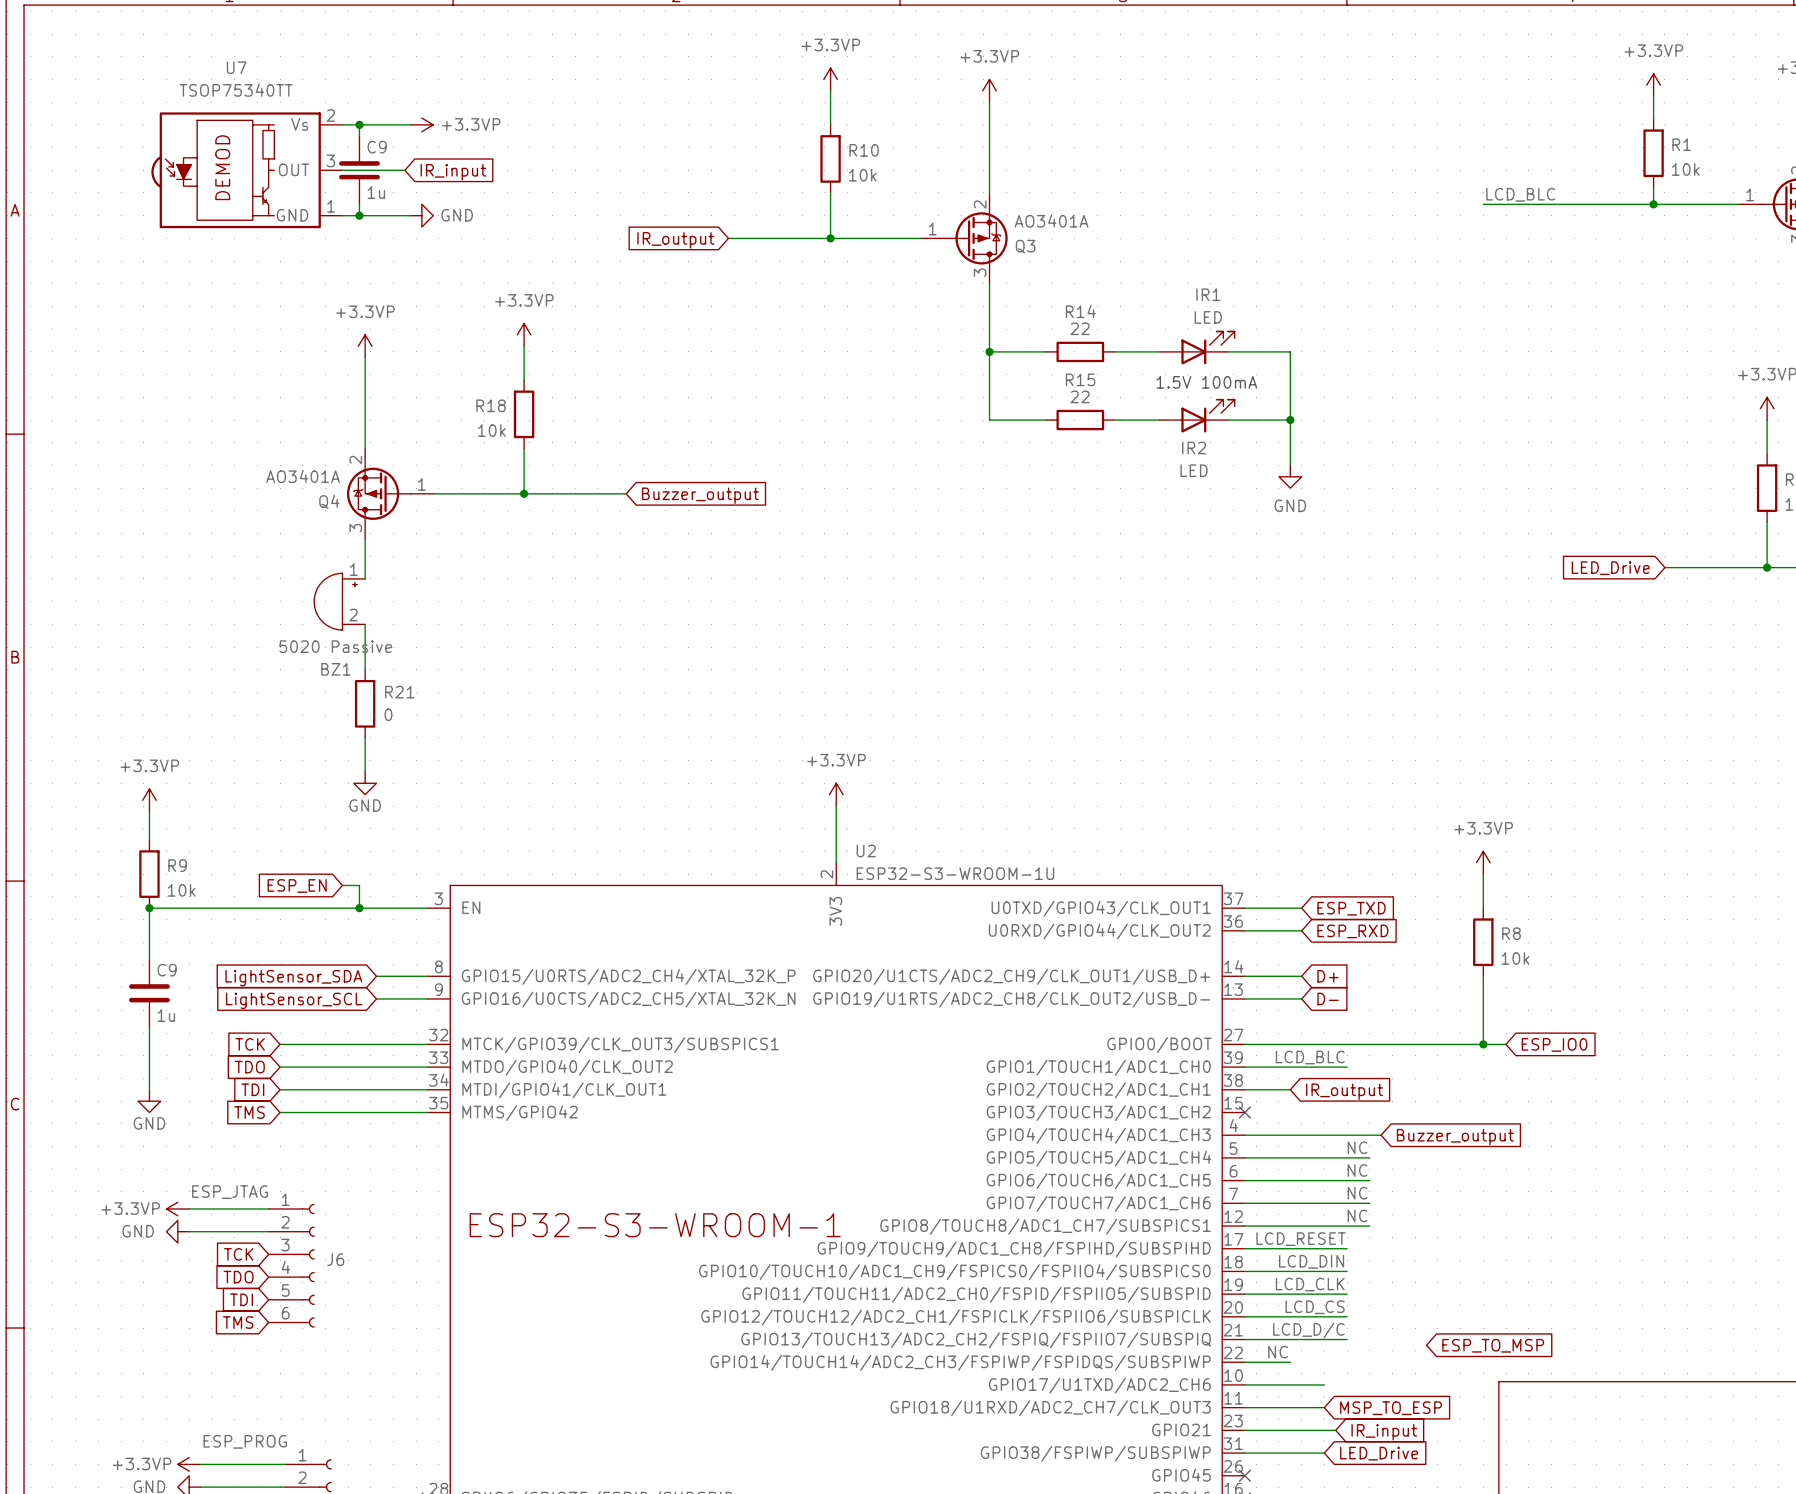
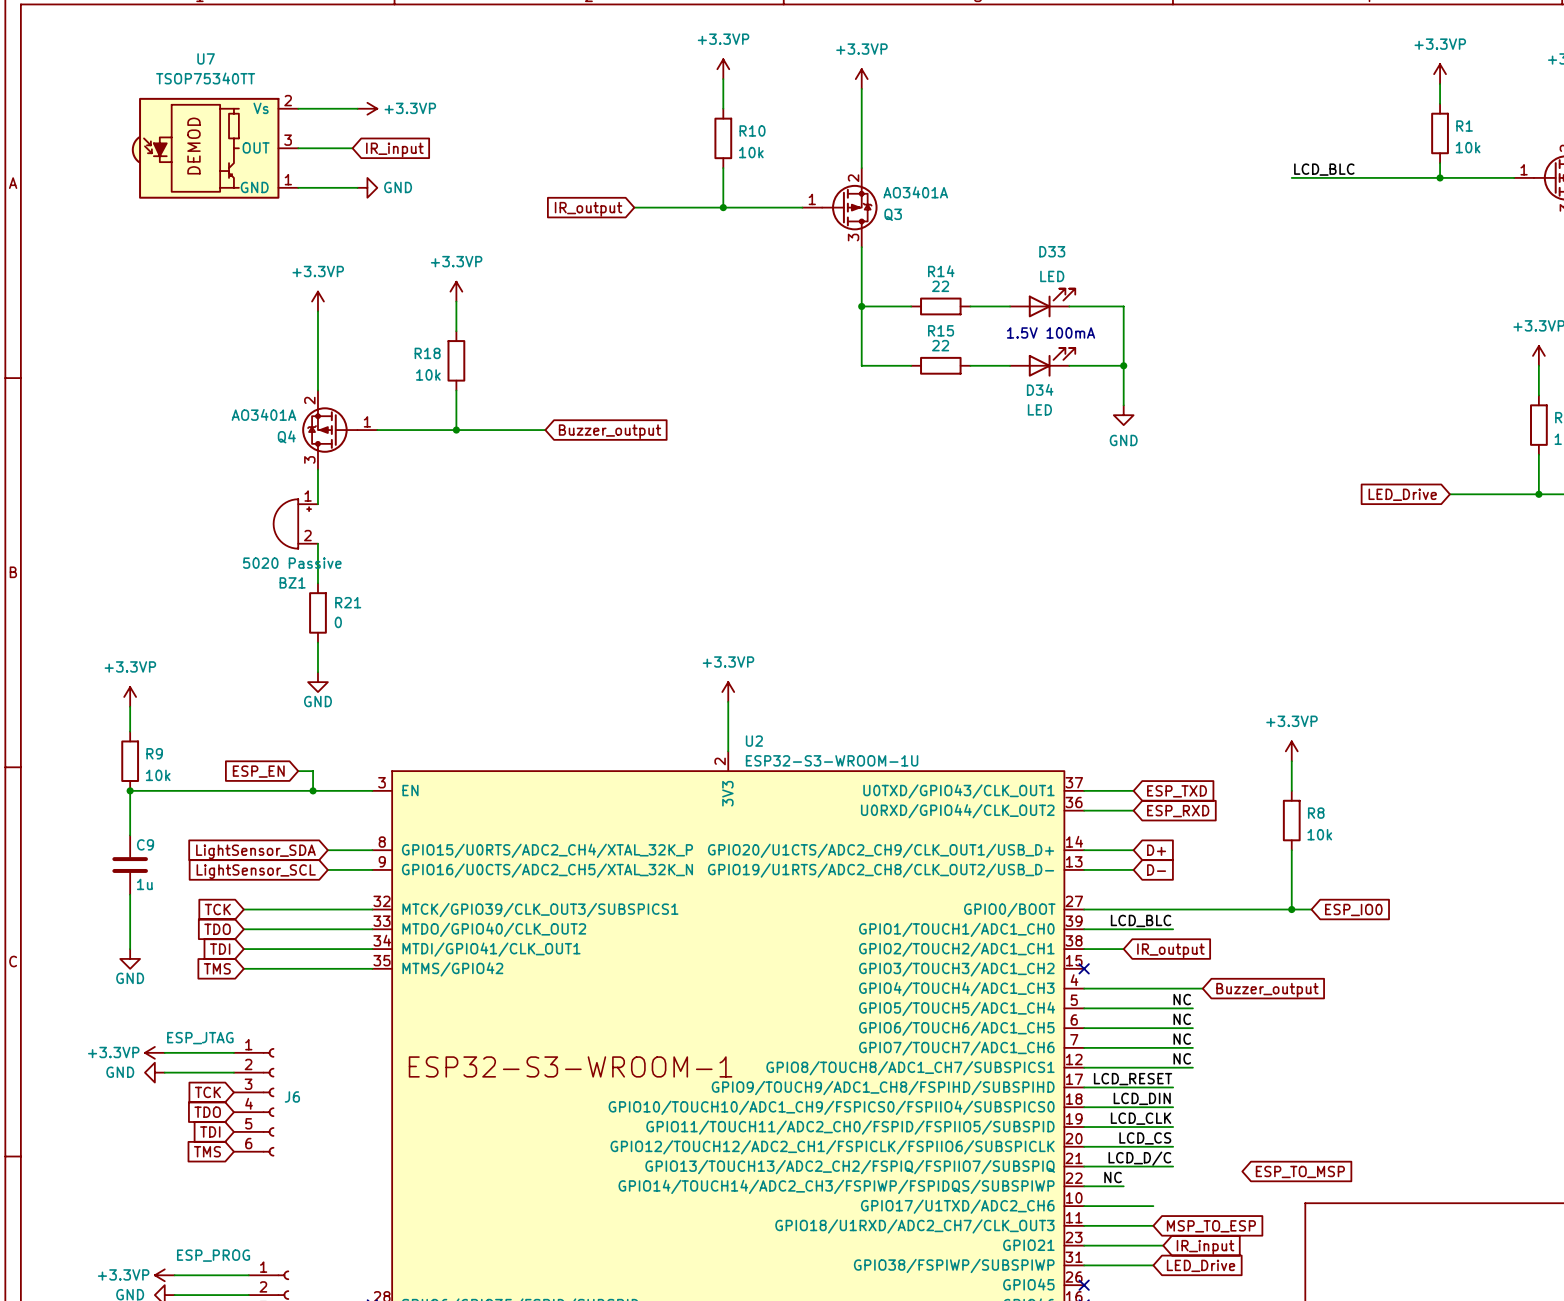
wire: (359, 124) (359, 136) -> none
junction: (359, 124) -> none
C9: 1u (359, 170) -> none
wire: (359, 204) (359, 215) -> none
junction: (359, 215) -> none
IR1 name: IR1 (1208, 294) -> D33 (1052, 251)
IR2 name: IR2 (1194, 447) -> D34 (1040, 389)

